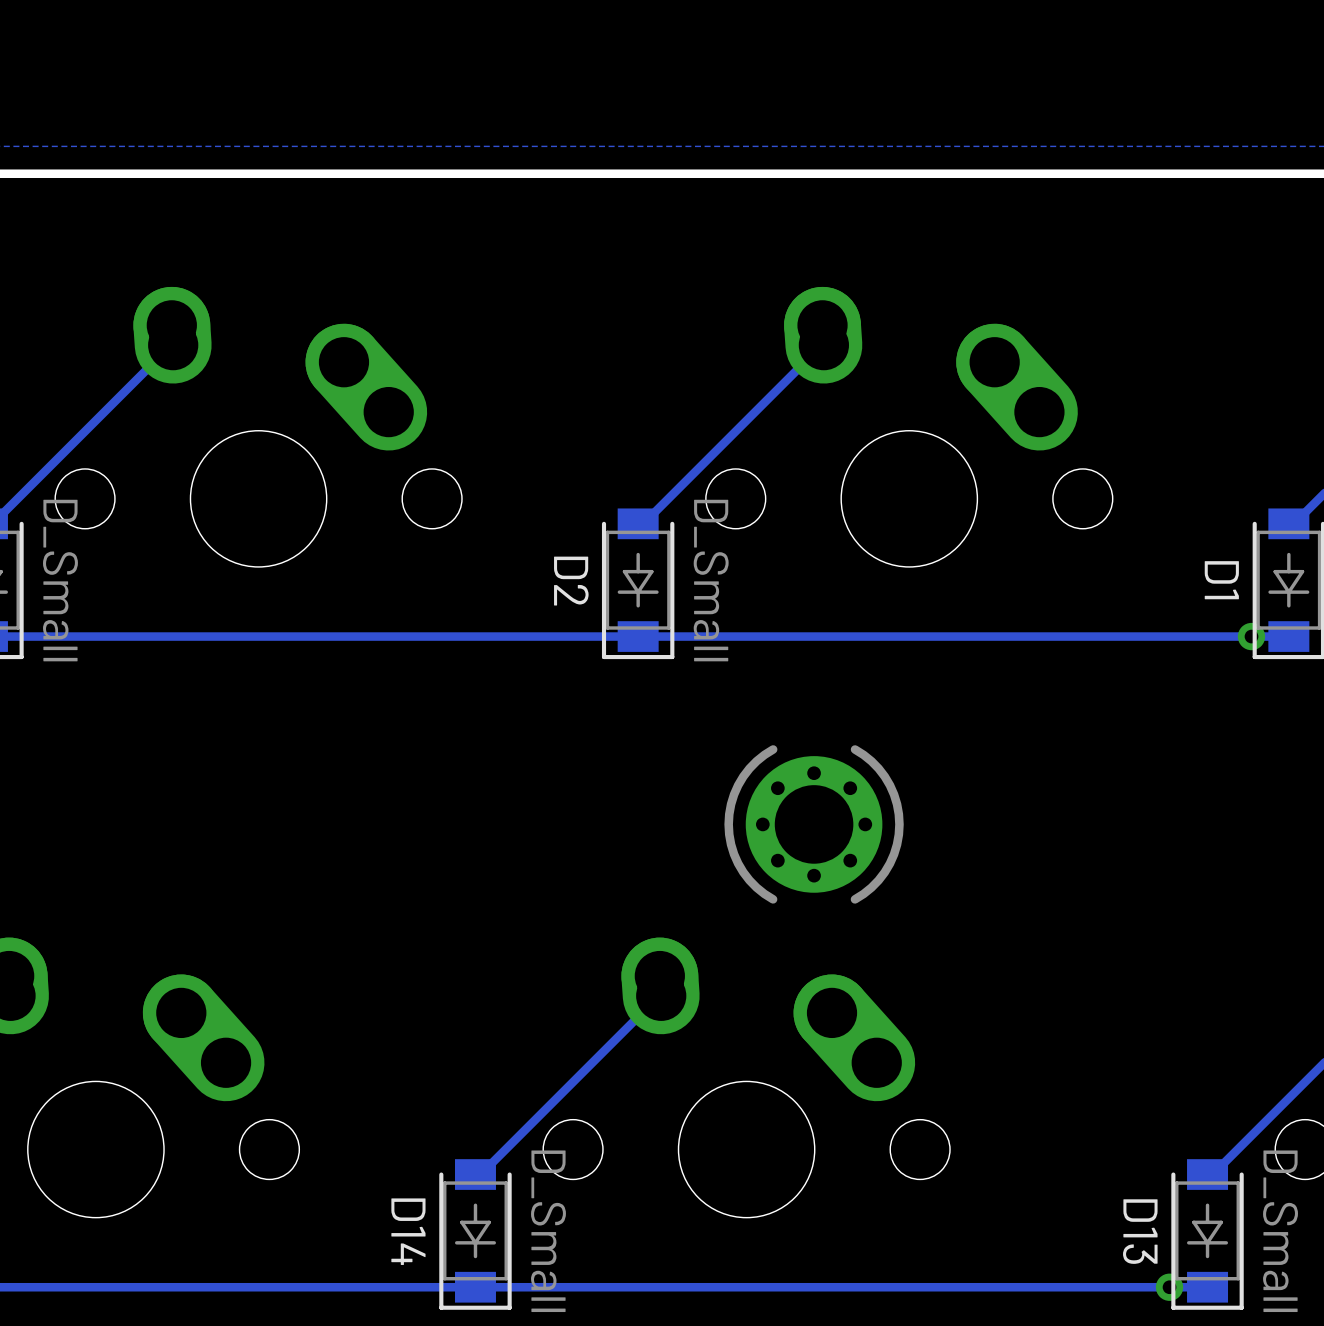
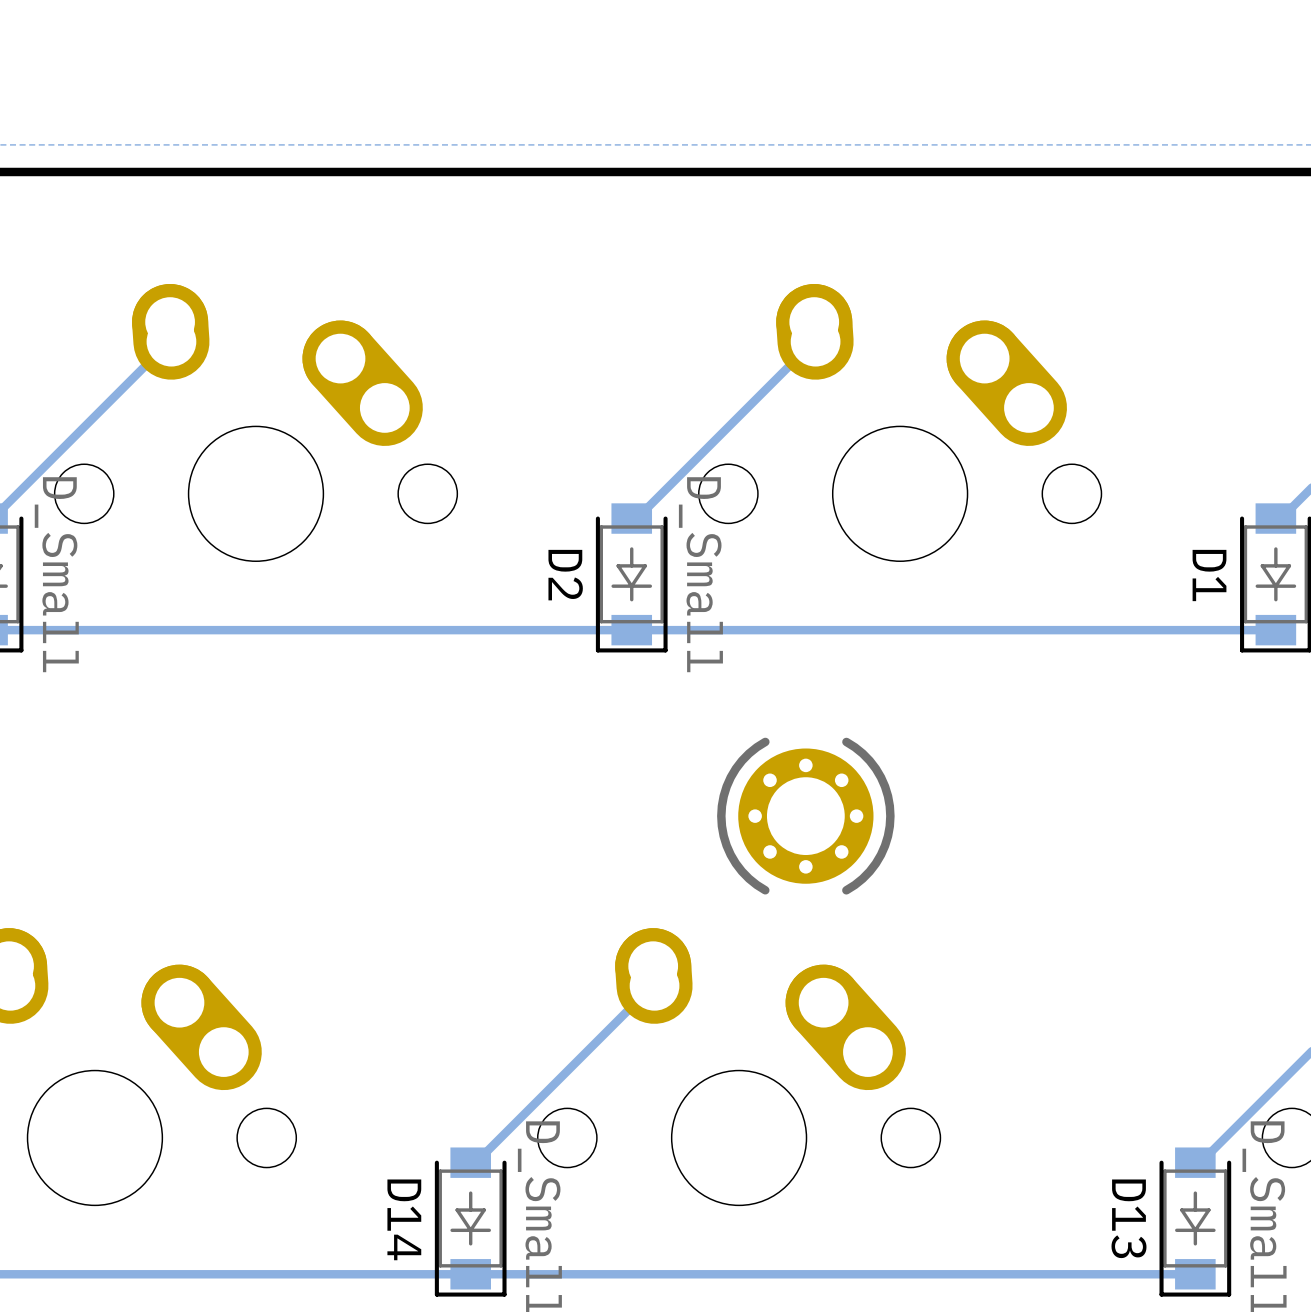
via: (1251, 636) -> none
via: (1169, 1287) -> none

